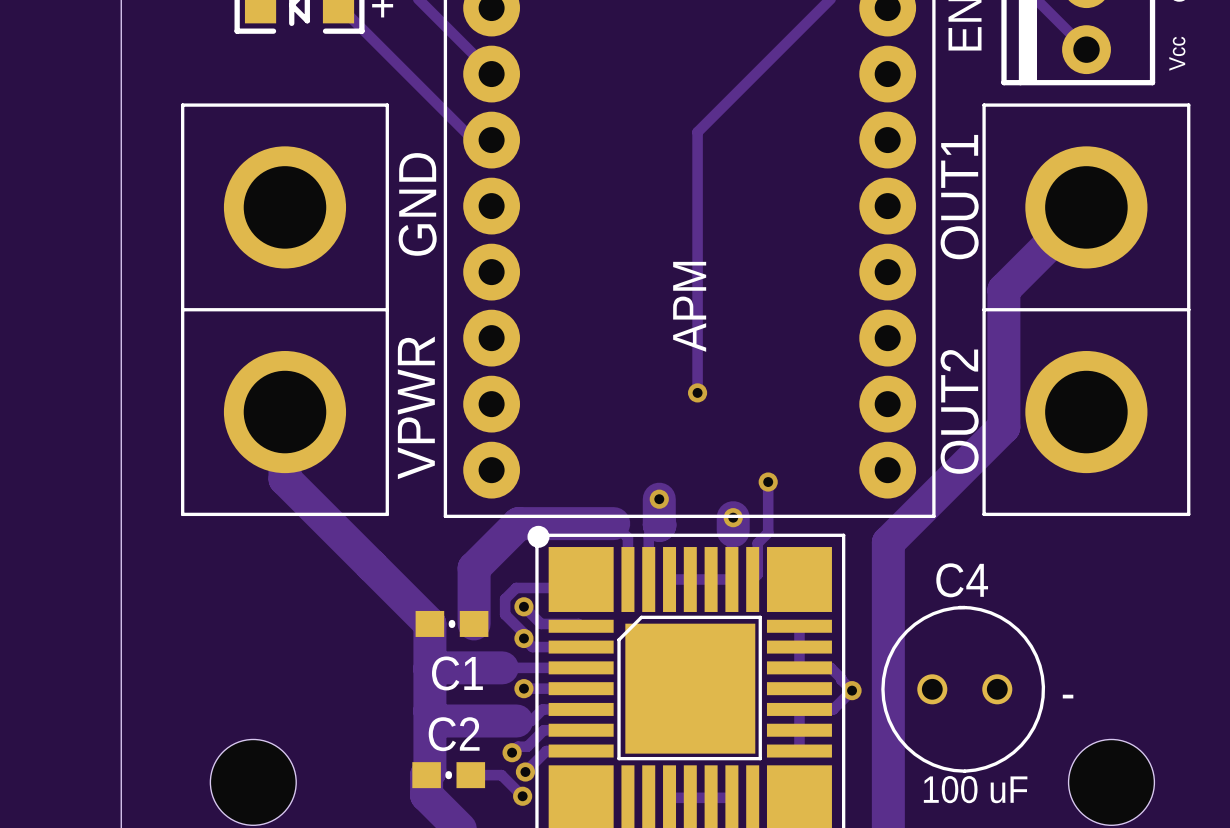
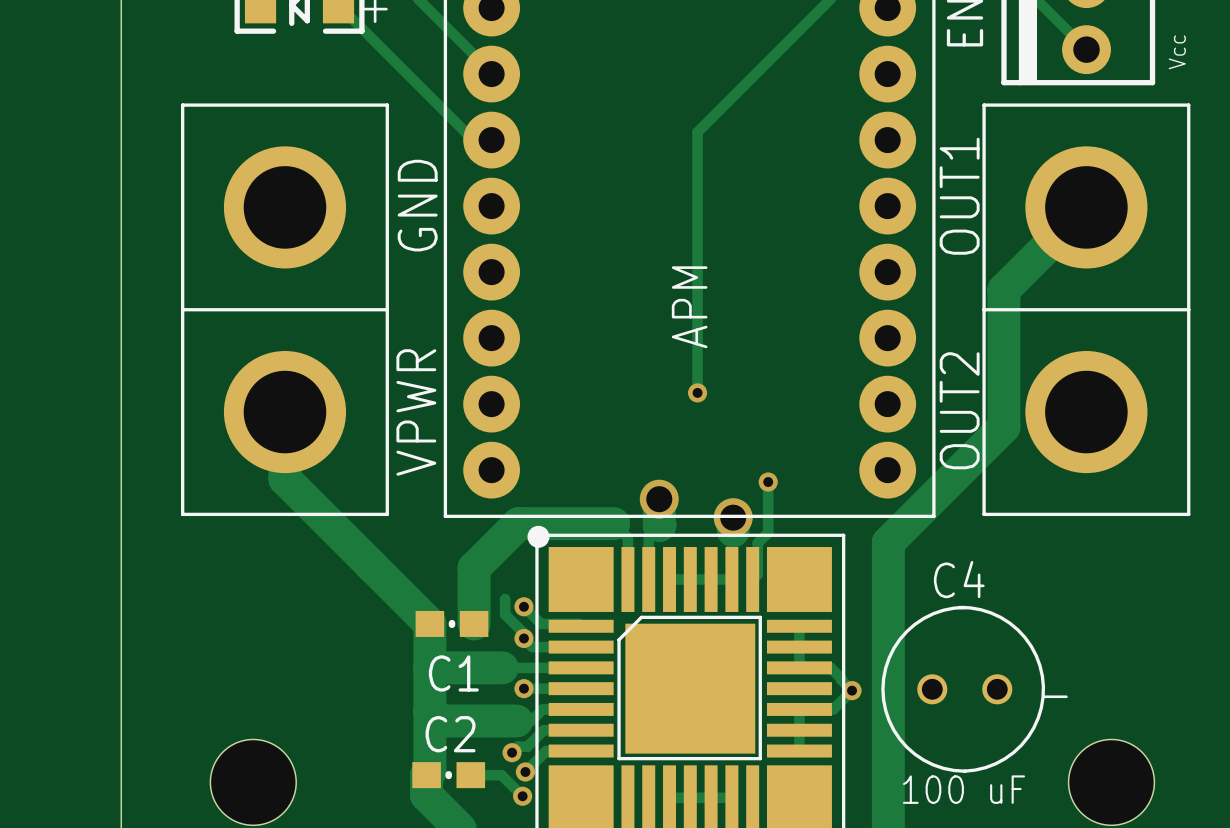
via size: [649, 489, 669, 509] -> [639, 479, 679, 519]
via size: [723, 508, 743, 528] -> [713, 498, 753, 538]
track: (581, 579) (572, 587) (516, 587) (505, 599) -> none

